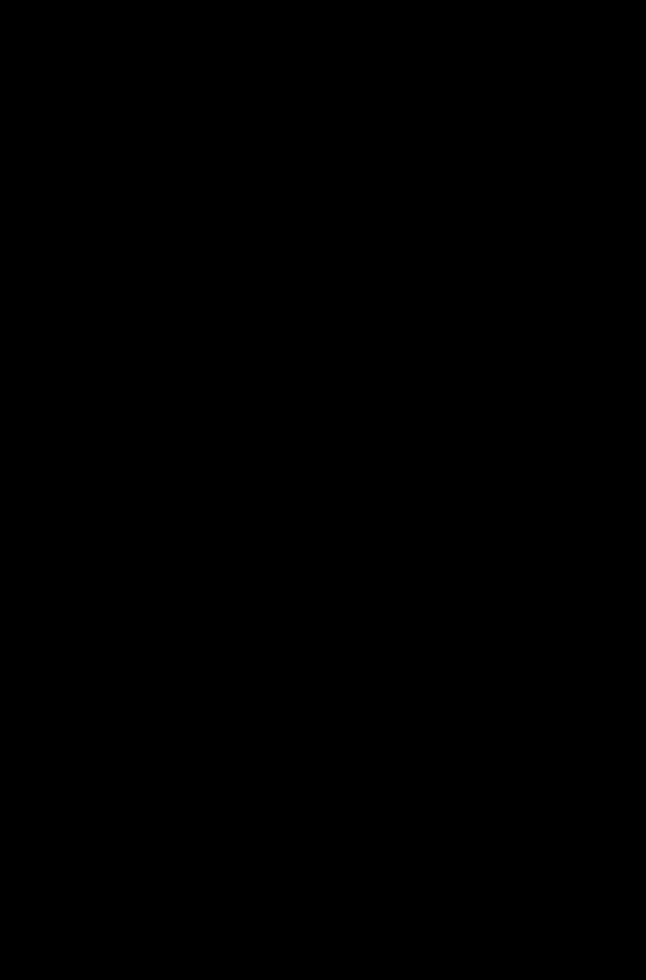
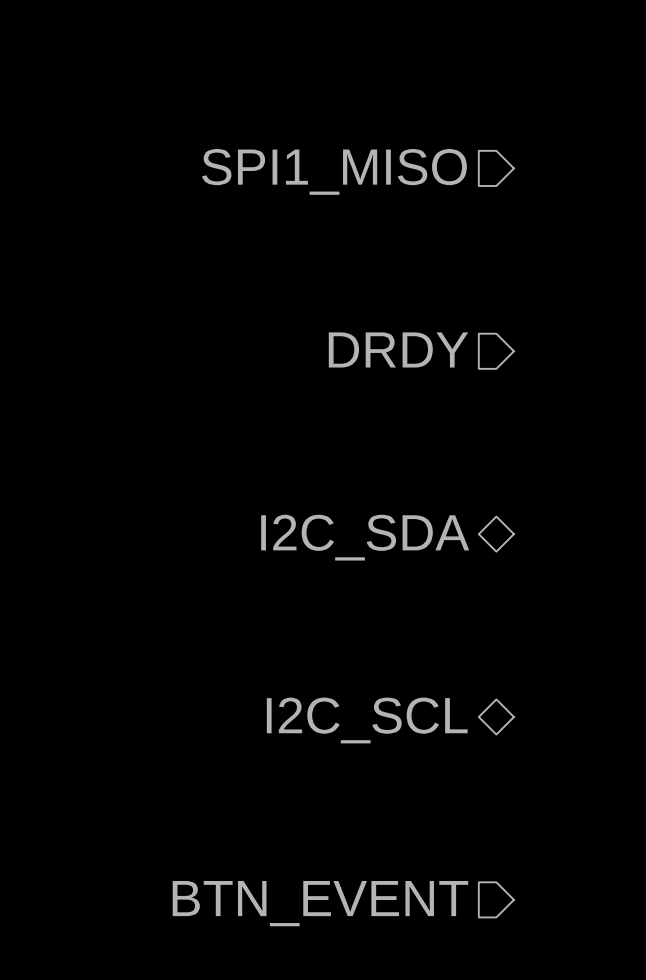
hierarchical label: none -> SPI1_MISO (334, 171)
hierarchical label: none -> DRDY (398, 349)
hierarchical label: none -> I2C_SDA (365, 537)
hierarchical label: none -> I2C_SCL (367, 720)
hierarchical label: none -> BTN_EVENT (320, 903)

